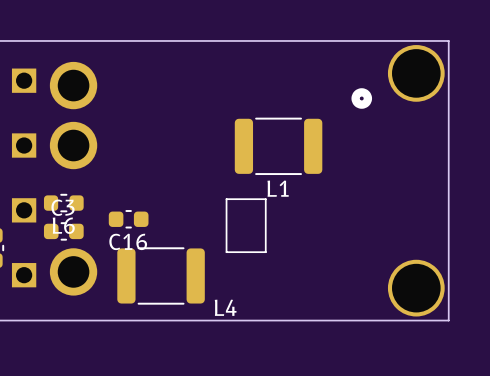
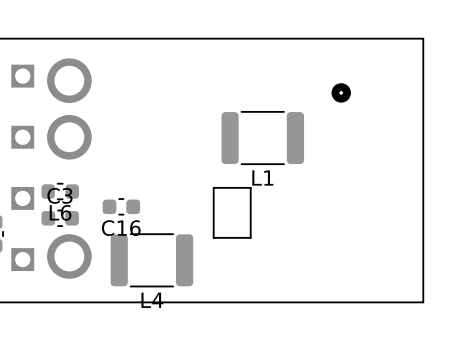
part: (416, 73) -> none
part: (416, 288) -> none
L4 name position: L4 (225, 307) -> L4 (152, 300)

